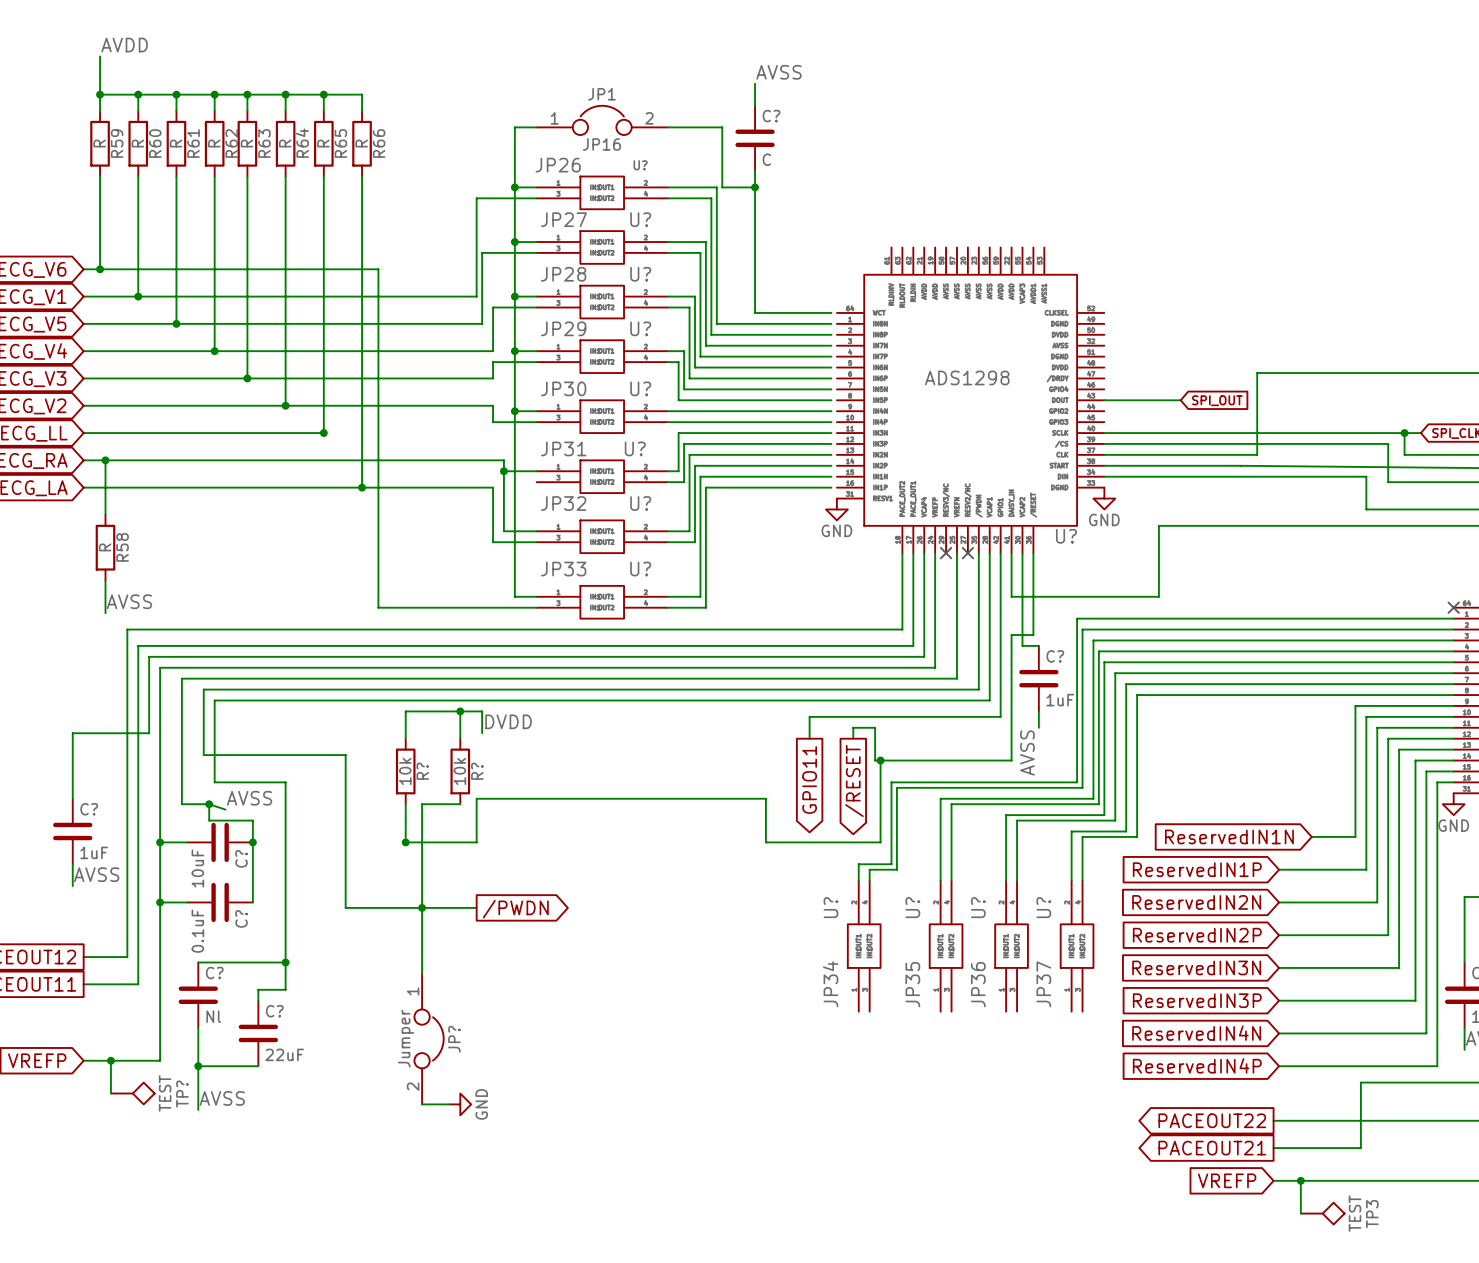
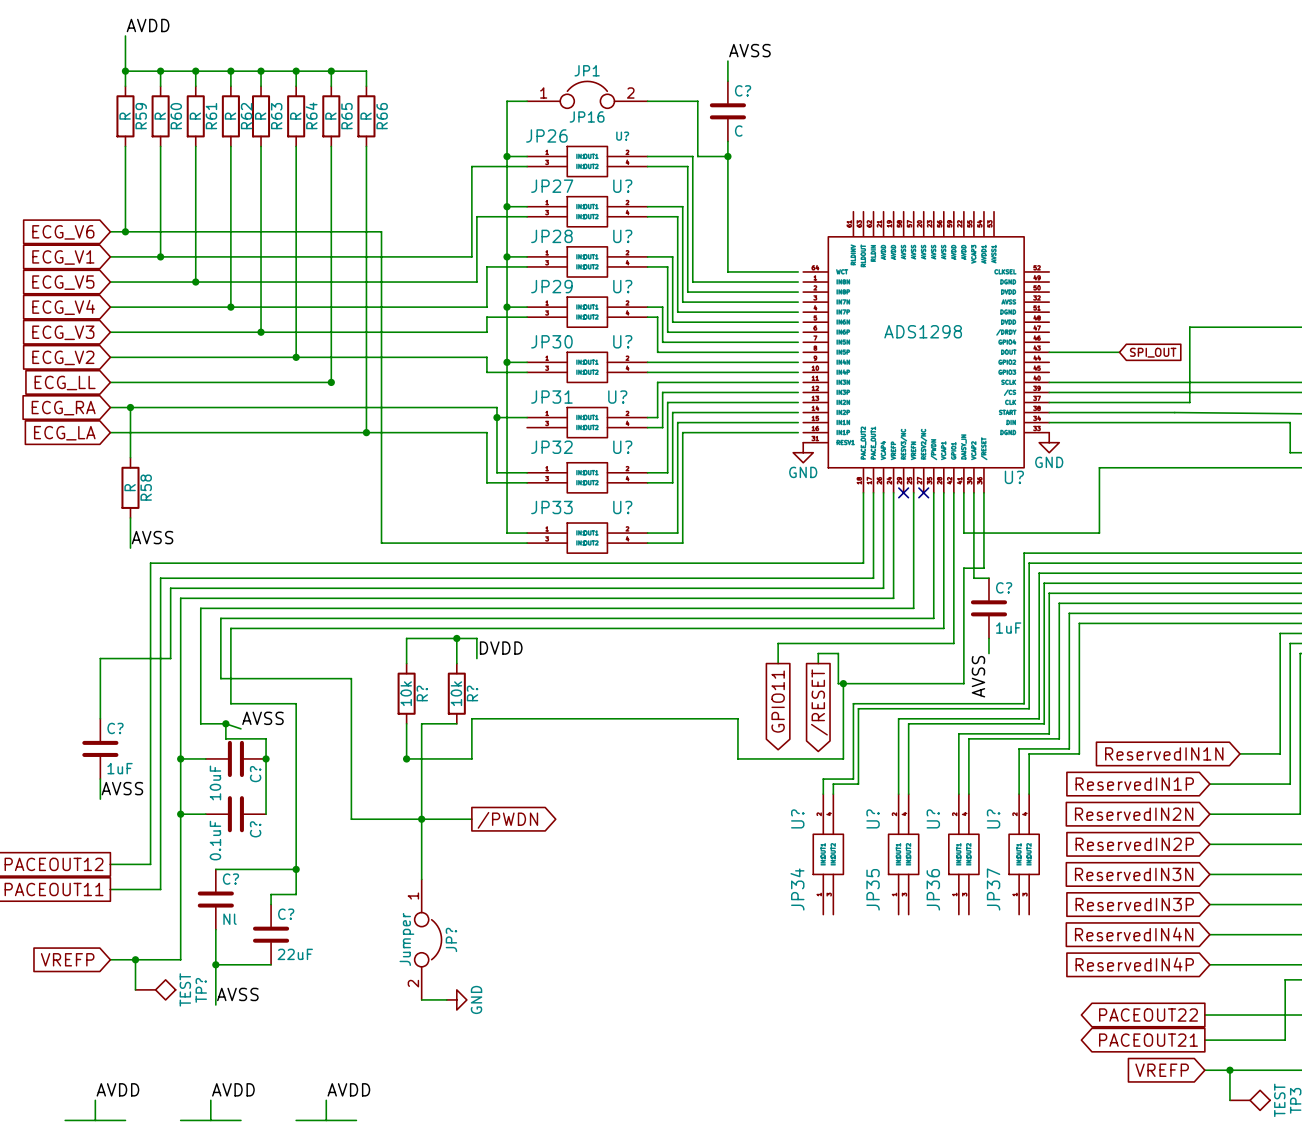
label: none -> AVDD (117, 1089)
label: none -> AVDD (233, 1089)
label: none -> AVDD (348, 1089)
wire: none -> (95, 1100) (95, 1120)
wire: none -> (210, 1100) (210, 1120)
wire: none -> (326, 1100) (326, 1120)
wire: none -> (65, 1120) (125, 1120)
wire: none -> (180, 1120) (240, 1120)
wire: none -> (296, 1120) (356, 1120)

